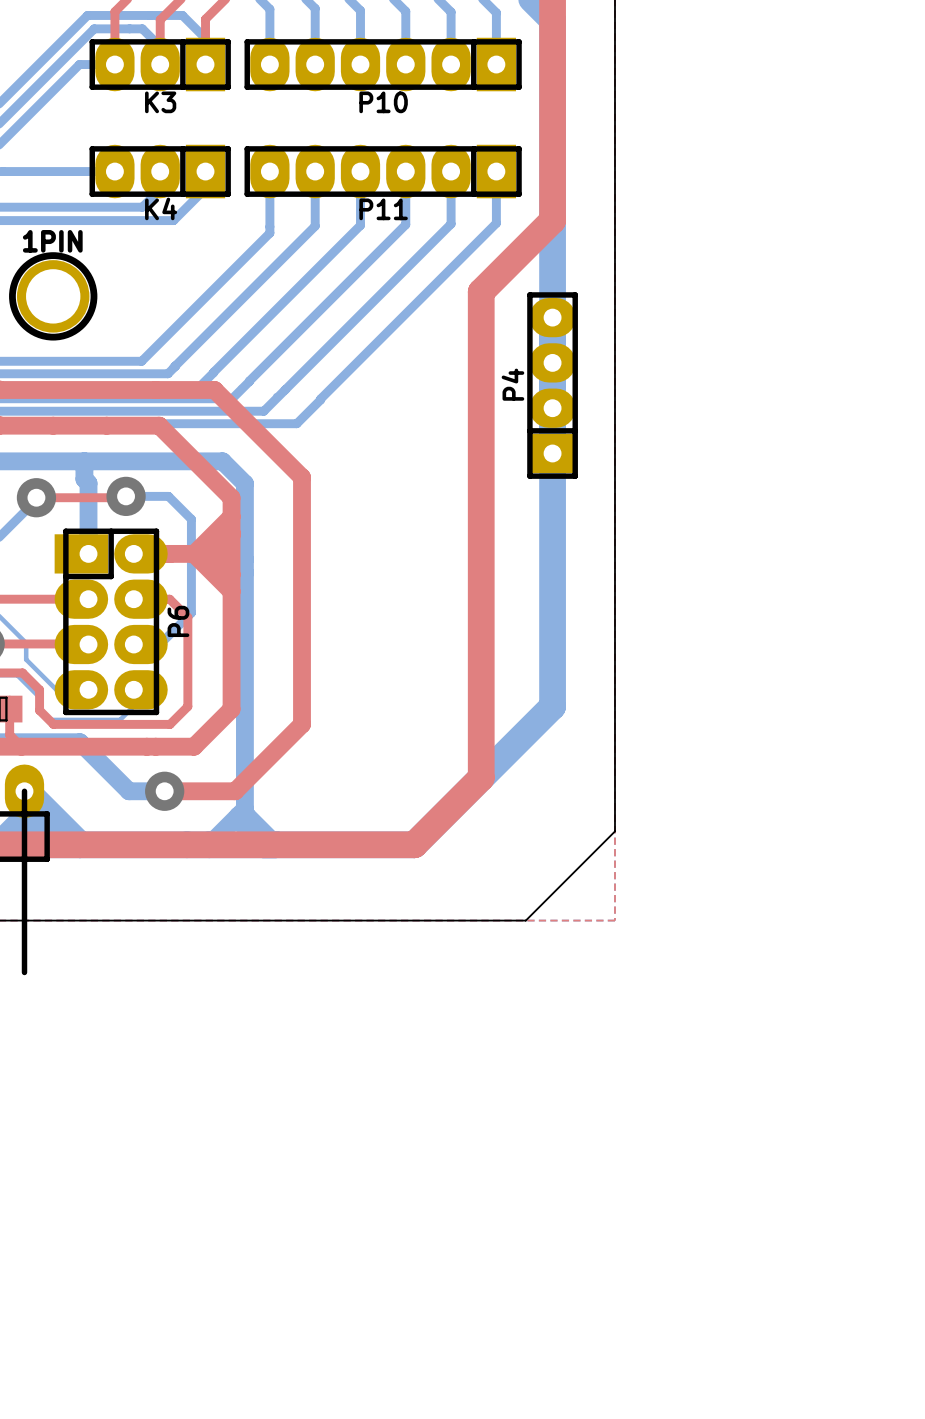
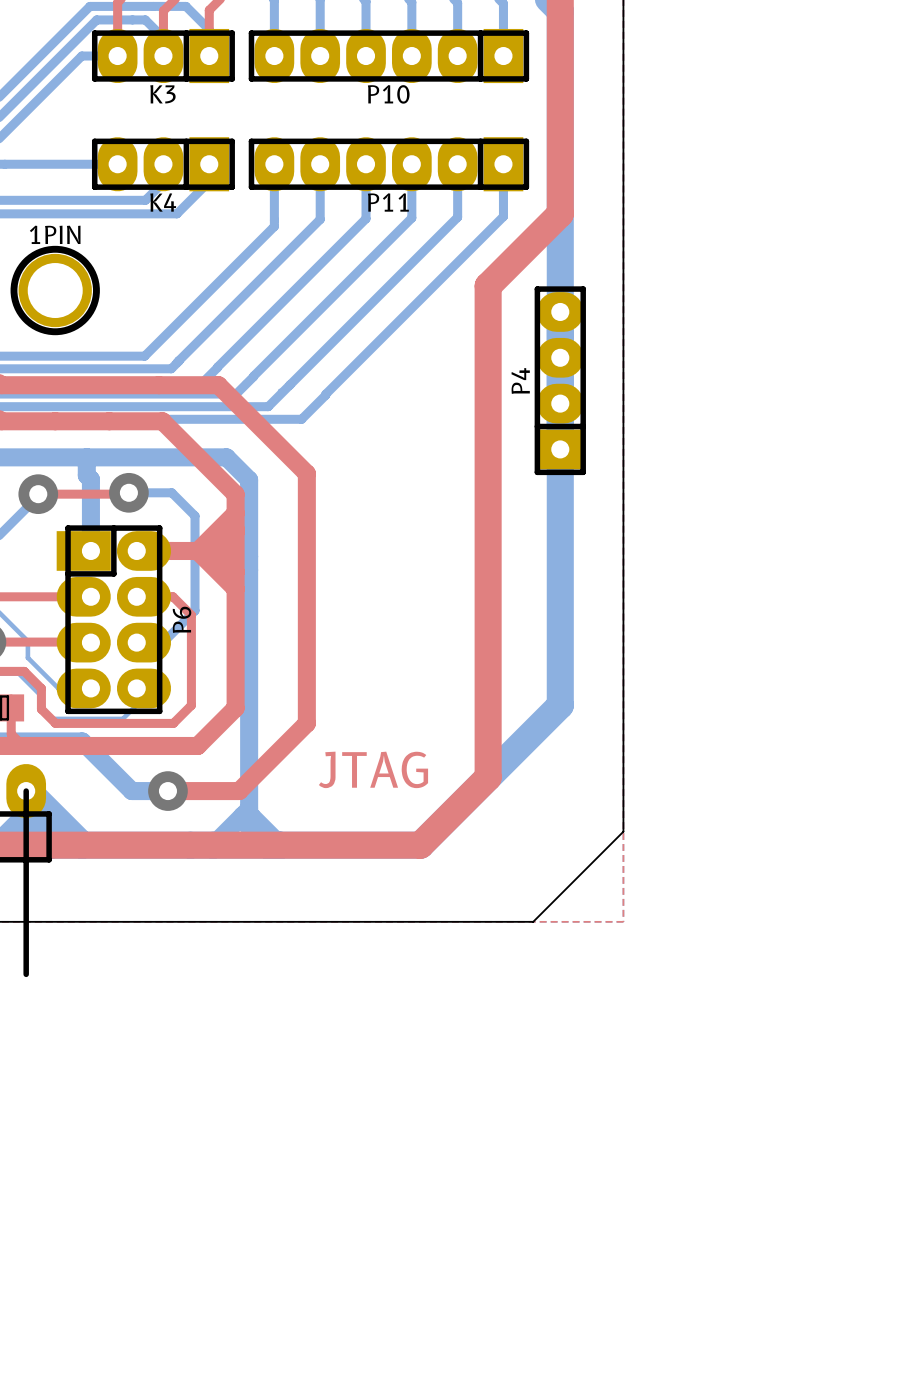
text: none -> JTAG (373, 769)

